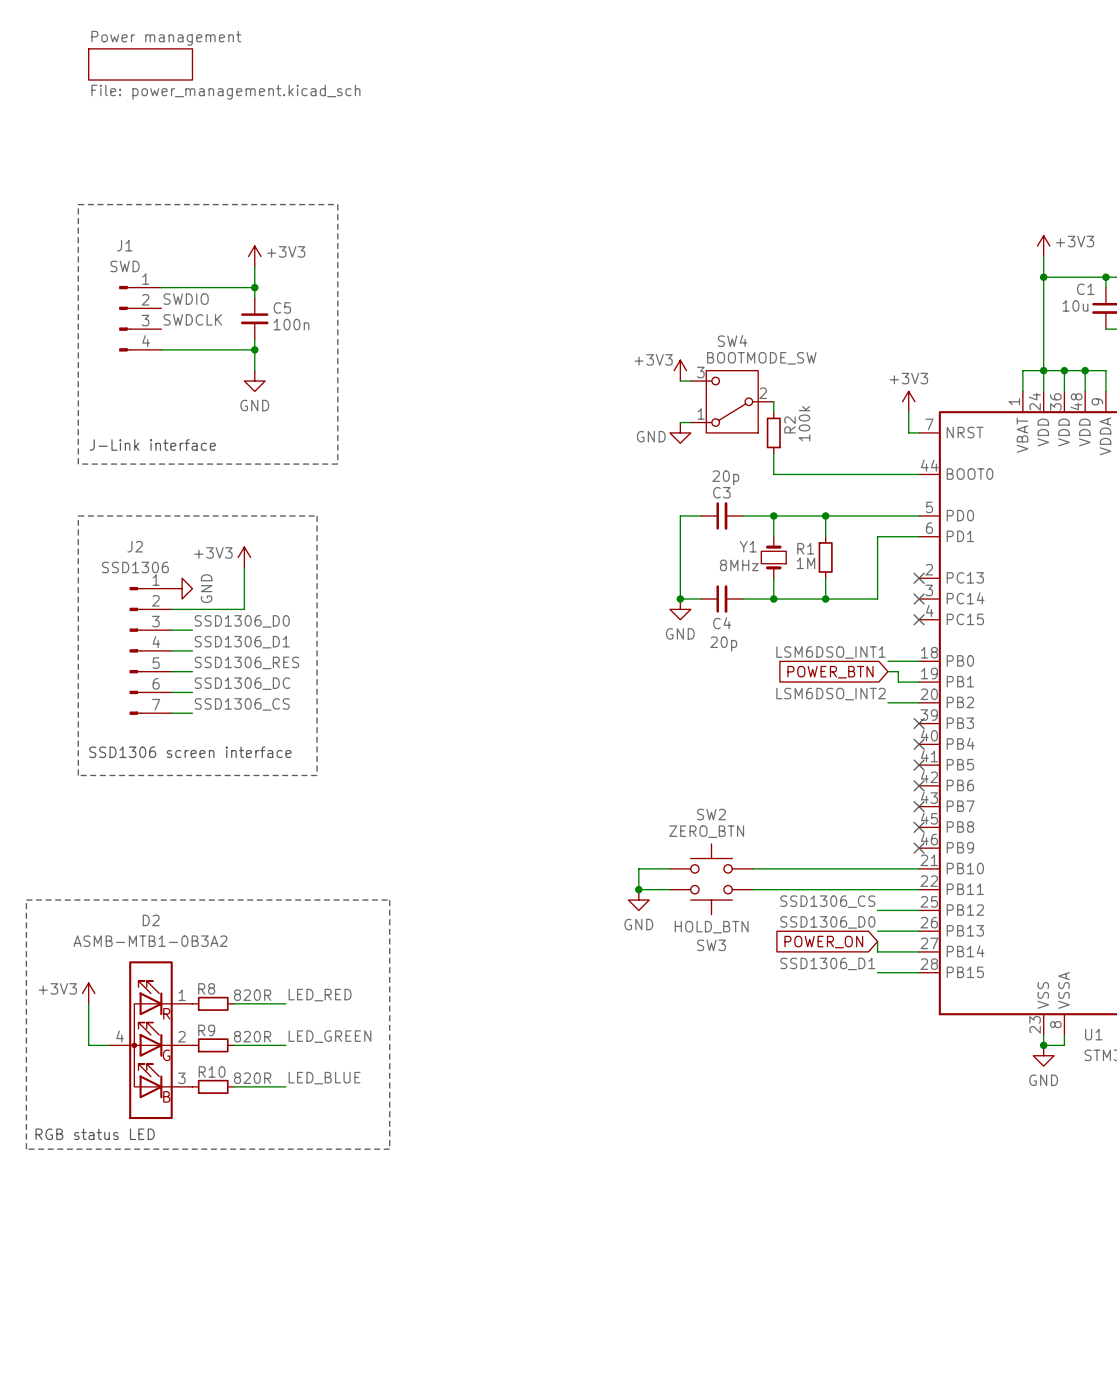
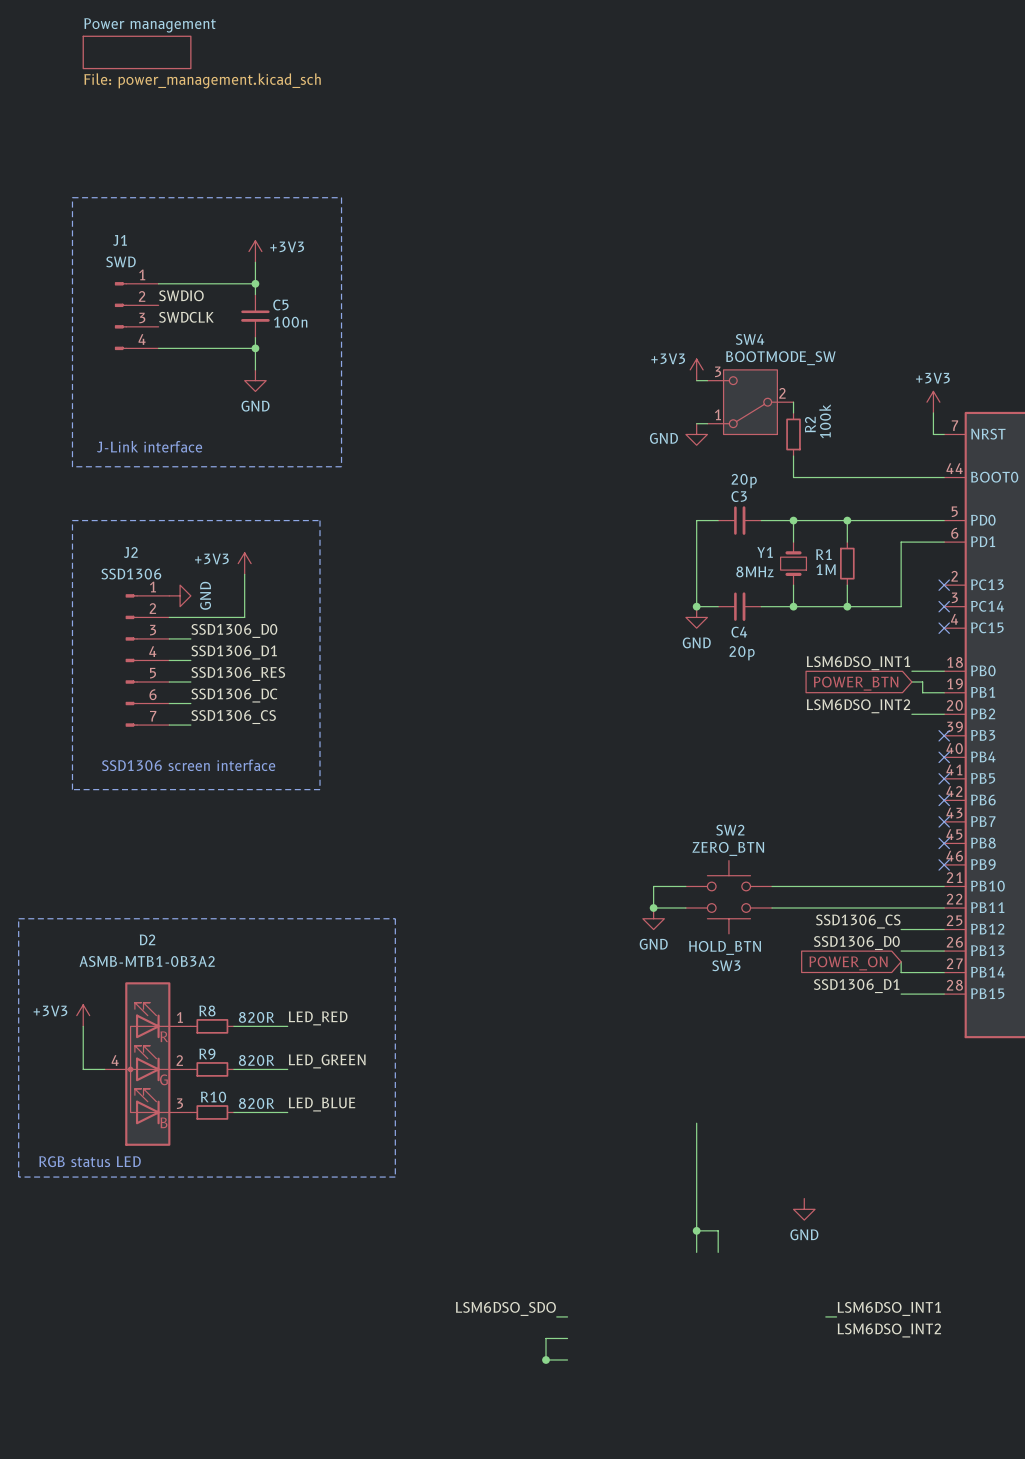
wire: none -> (696, 1123) (696, 1252)
power symbol: none -> GND (804, 1209)
wire: none -> (696, 1230) (718, 1230) (718, 1252)
junction: none -> (696, 1230)
label: none -> LSM6DSO_SDO (505, 1308)
label: none -> LSM6DSO_INT1 (889, 1308)
wire: none -> (556, 1316) (567, 1316)
wire: none -> (825, 1316) (836, 1316)
label: none -> LSM6DSO_INT2 (889, 1330)
wire: none -> (567, 1338) (546, 1338) (546, 1360) (567, 1360)
junction: none -> (546, 1360)

